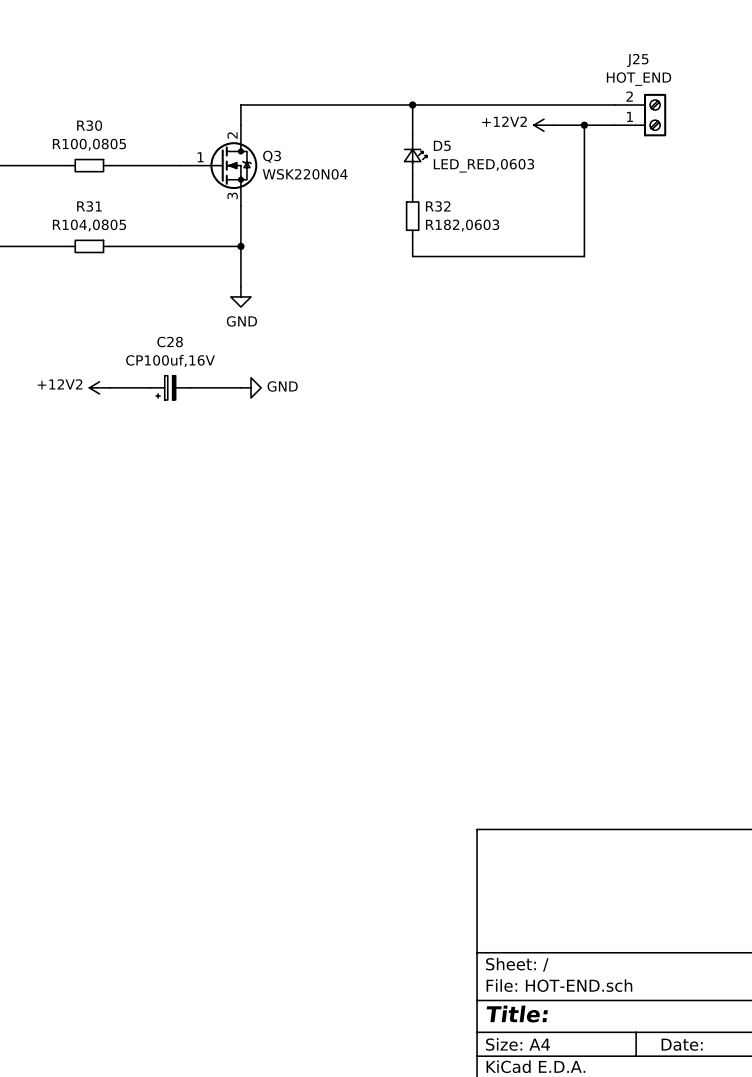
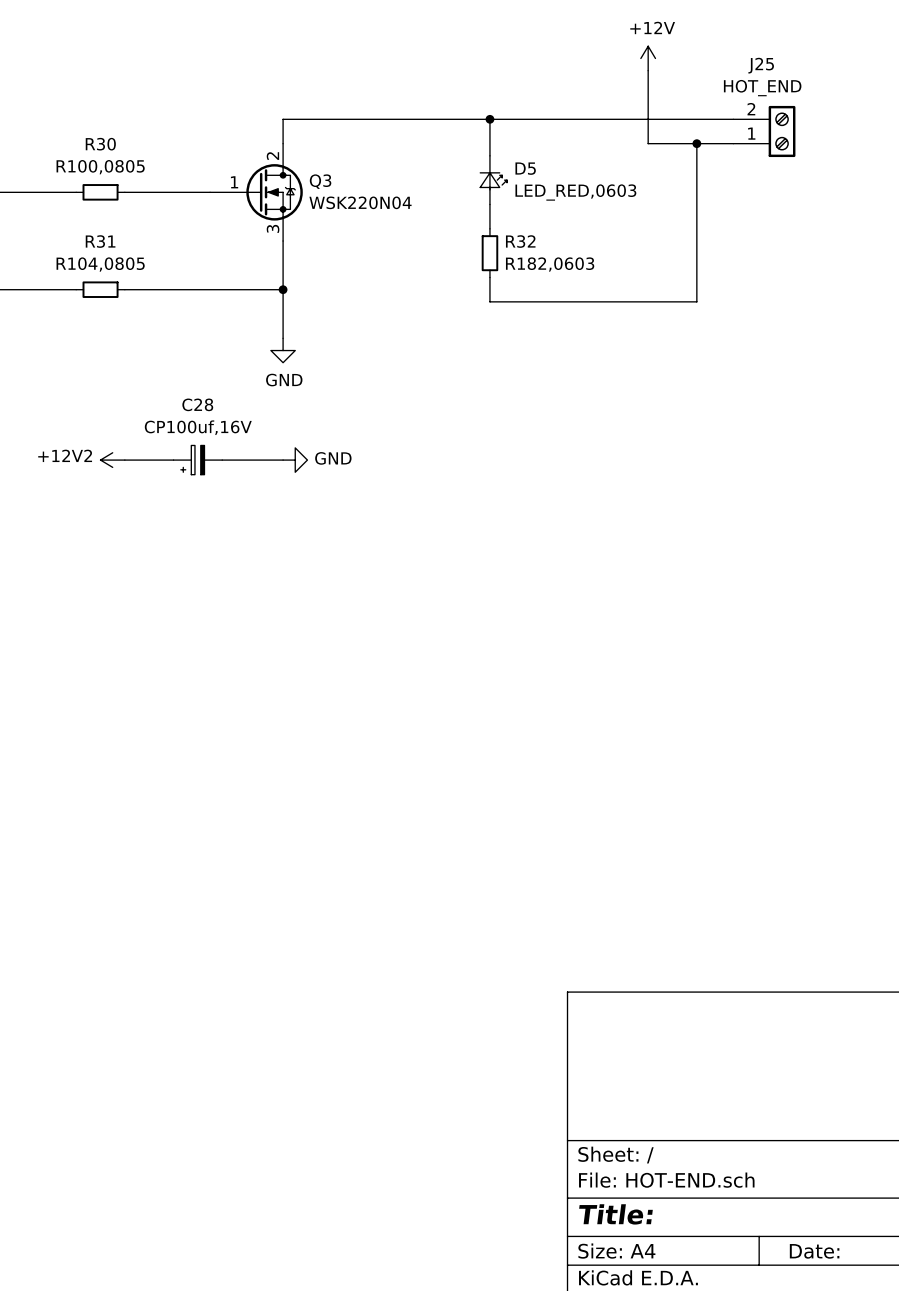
power symbol: none -> +12V (648, 58)
wire: none -> (648, 70) (648, 143) (660, 143)
power symbol: +12V2 (543, 125) -> none

